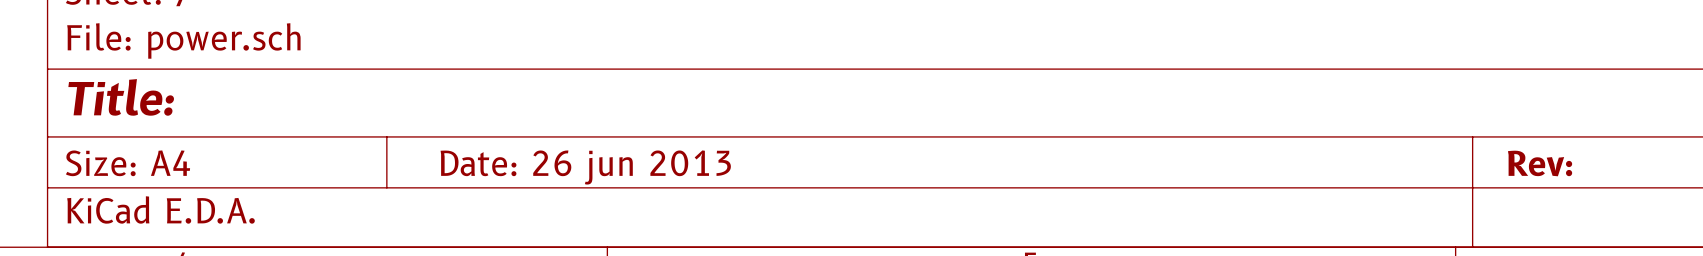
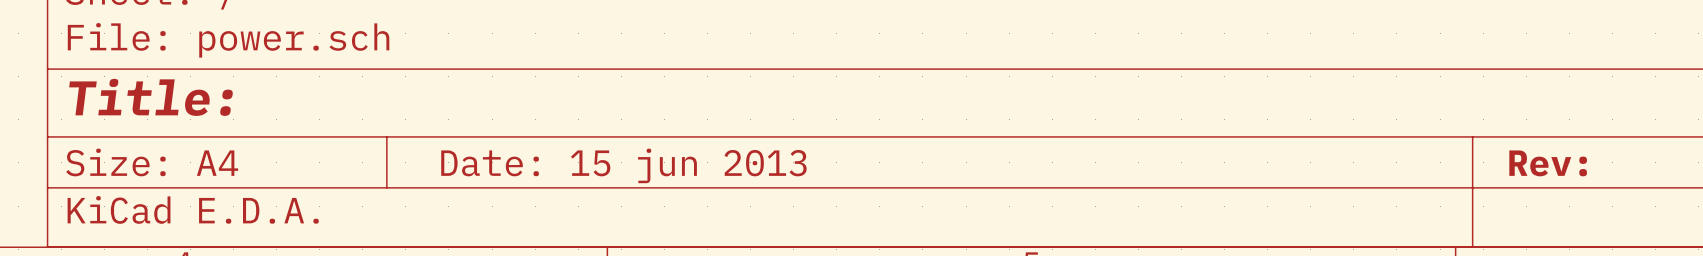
title block: Date: 26 jun 2013 (585, 167) -> Date: 15 jun 2013 (623, 165)

